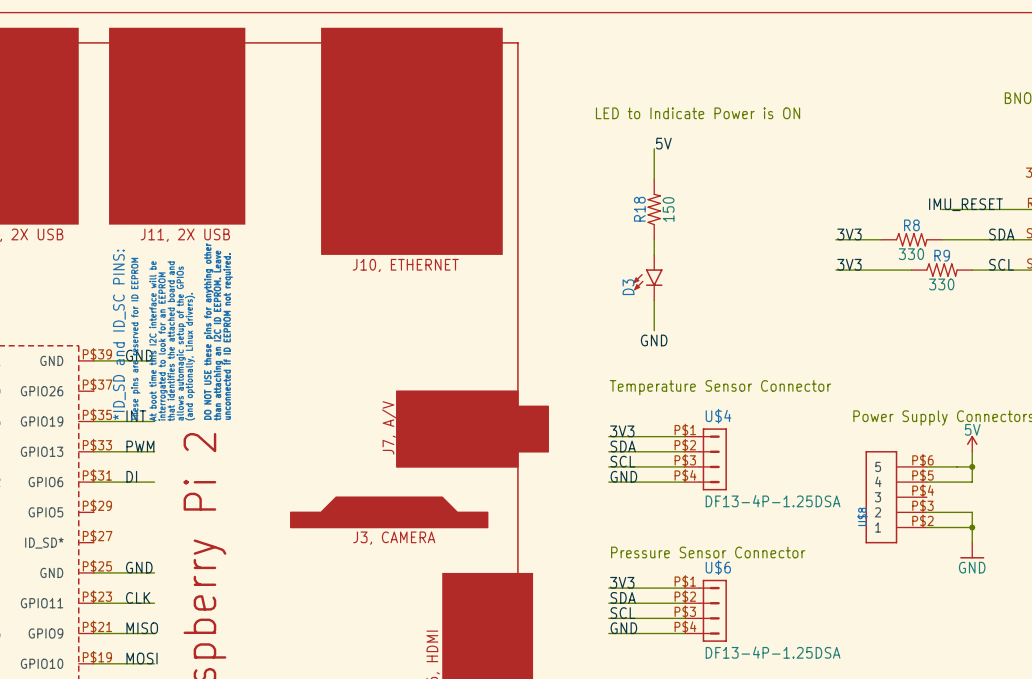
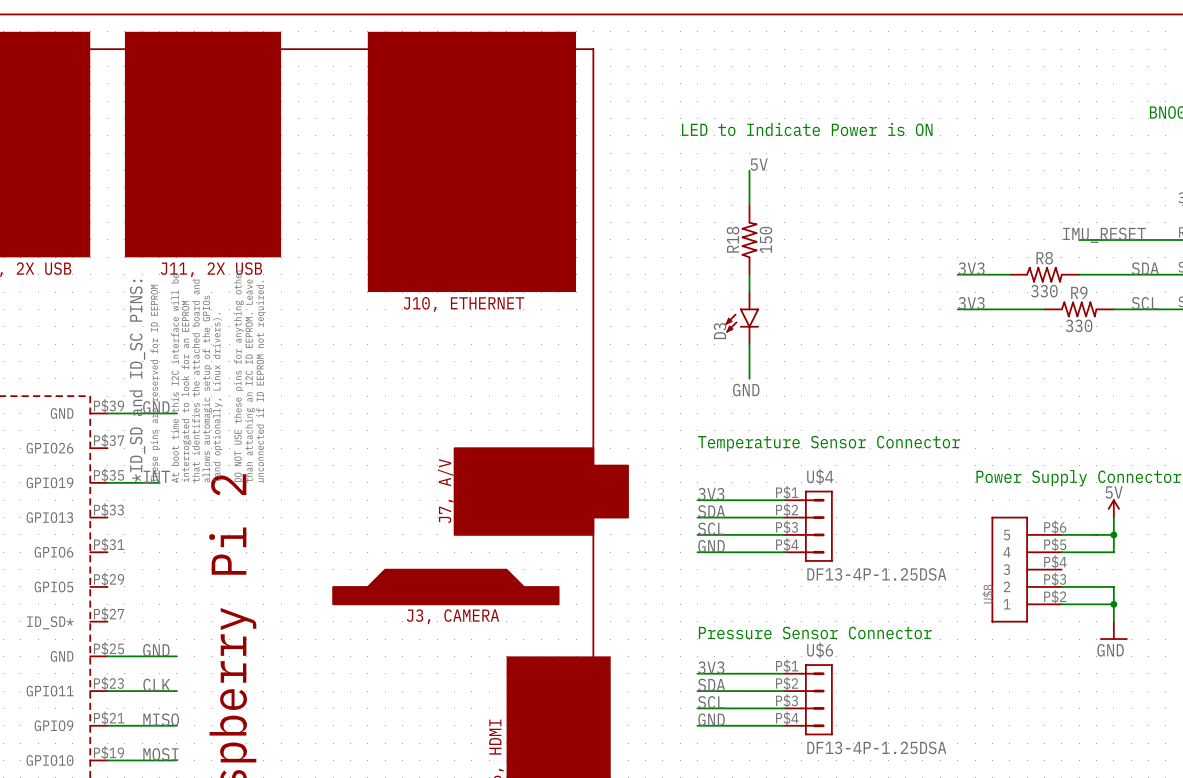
wire: (139, 421) (154, 421) -> none
label: PWM (140, 446) -> none
wire: (93, 451) (154, 451) -> none
label: DI (131, 476) -> none
wire: (93, 482) (154, 482) -> none

